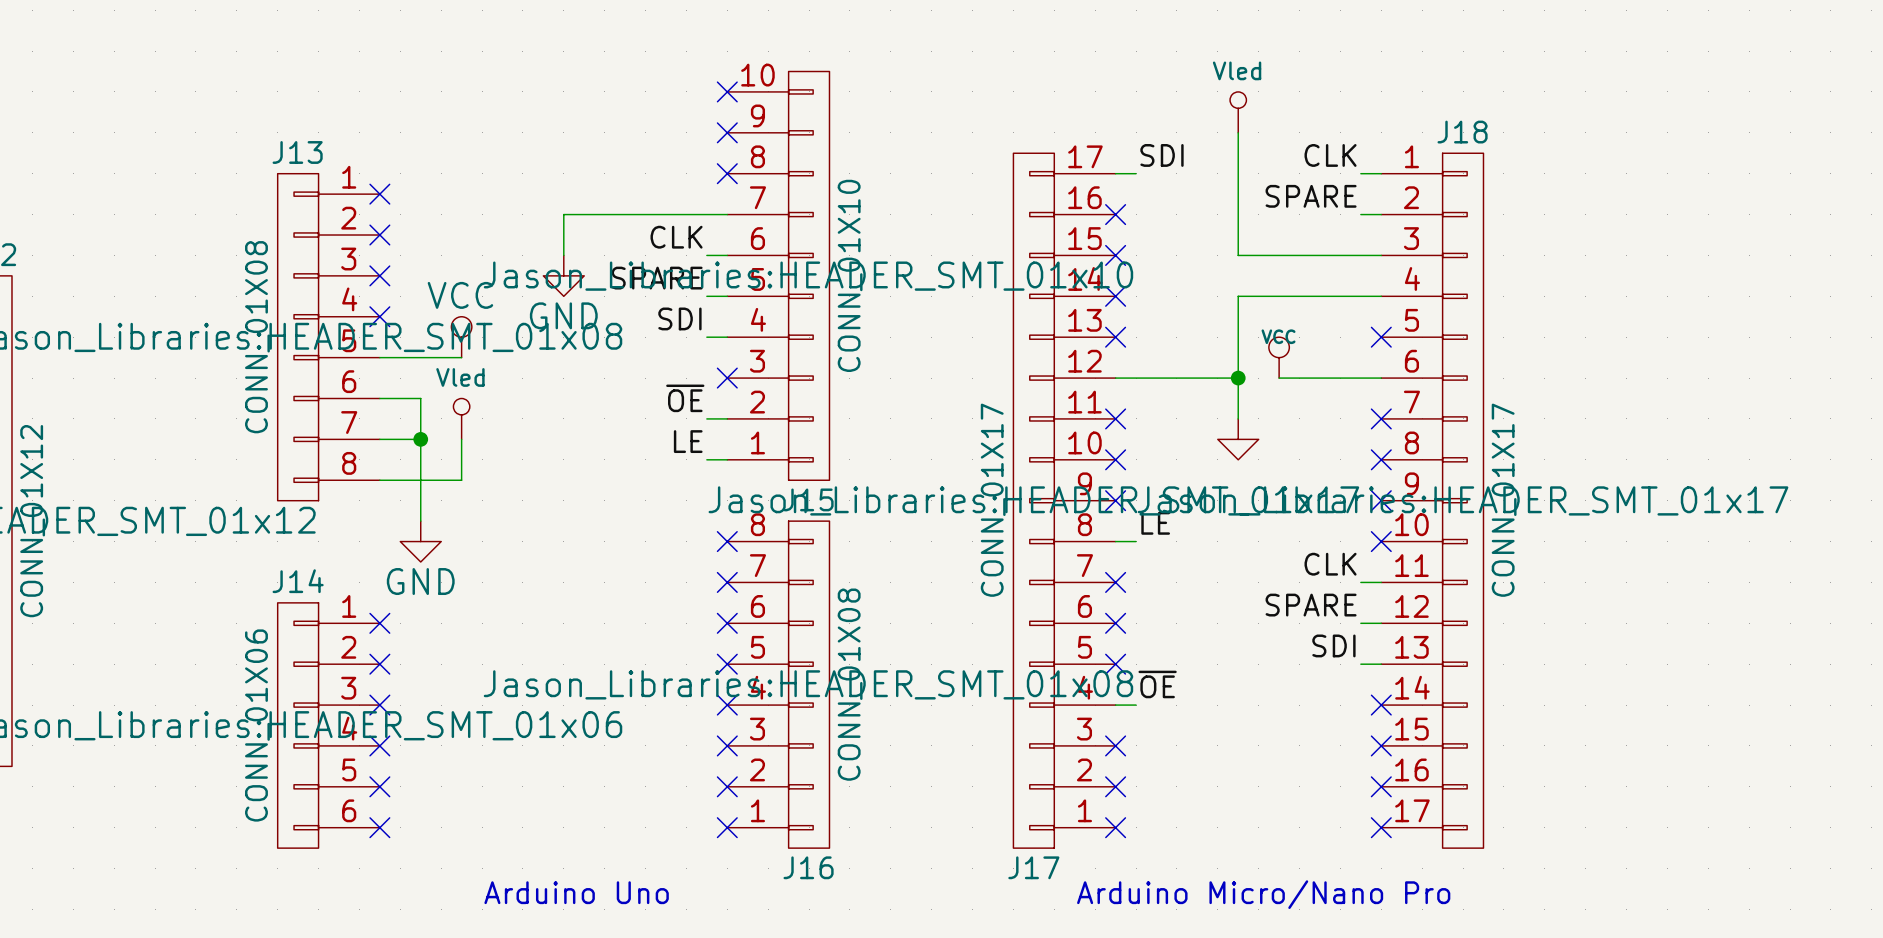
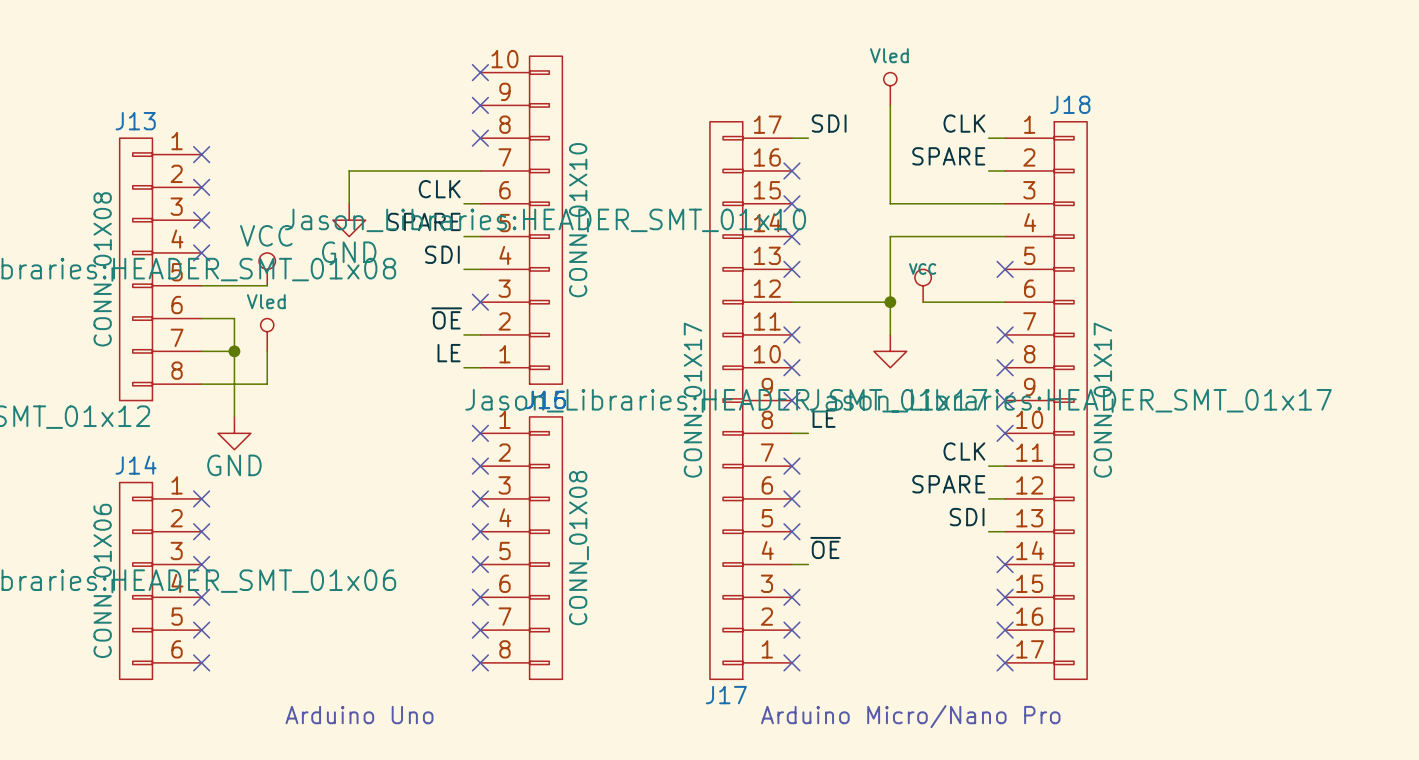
J16 text: Jason_Libraries:HEADER_SMT_01x08 (808, 684) -> none
J16 flip: as is (809, 684) -> up-down (545, 548)

